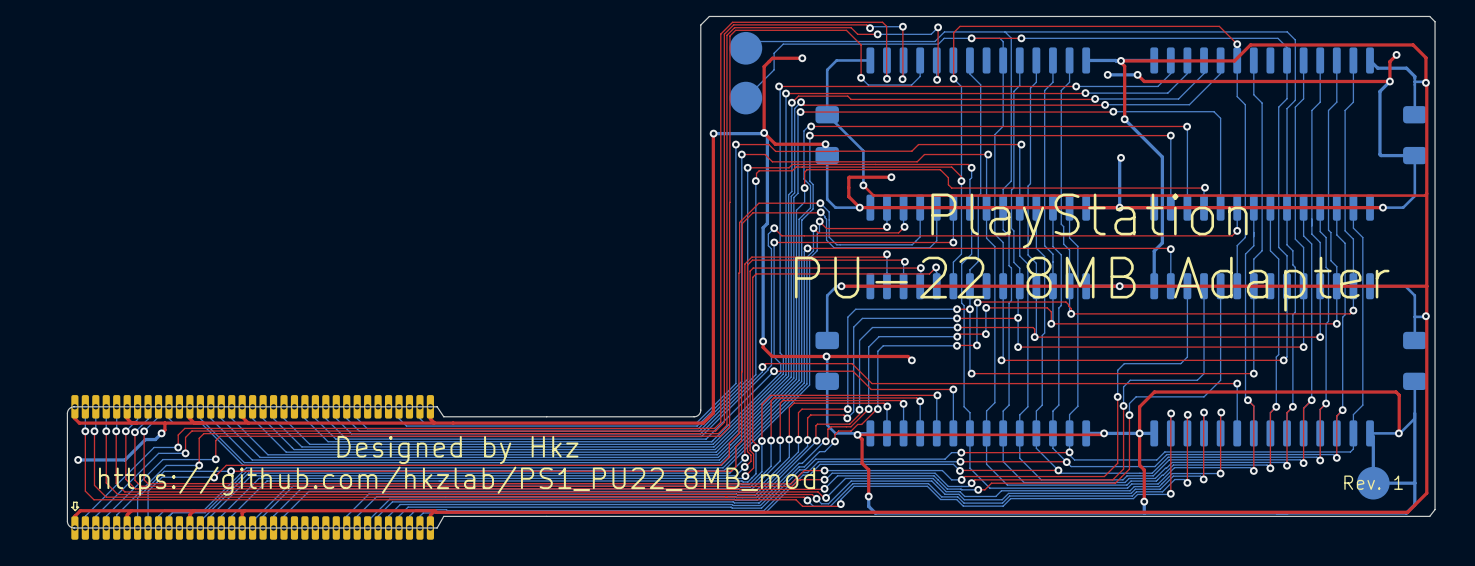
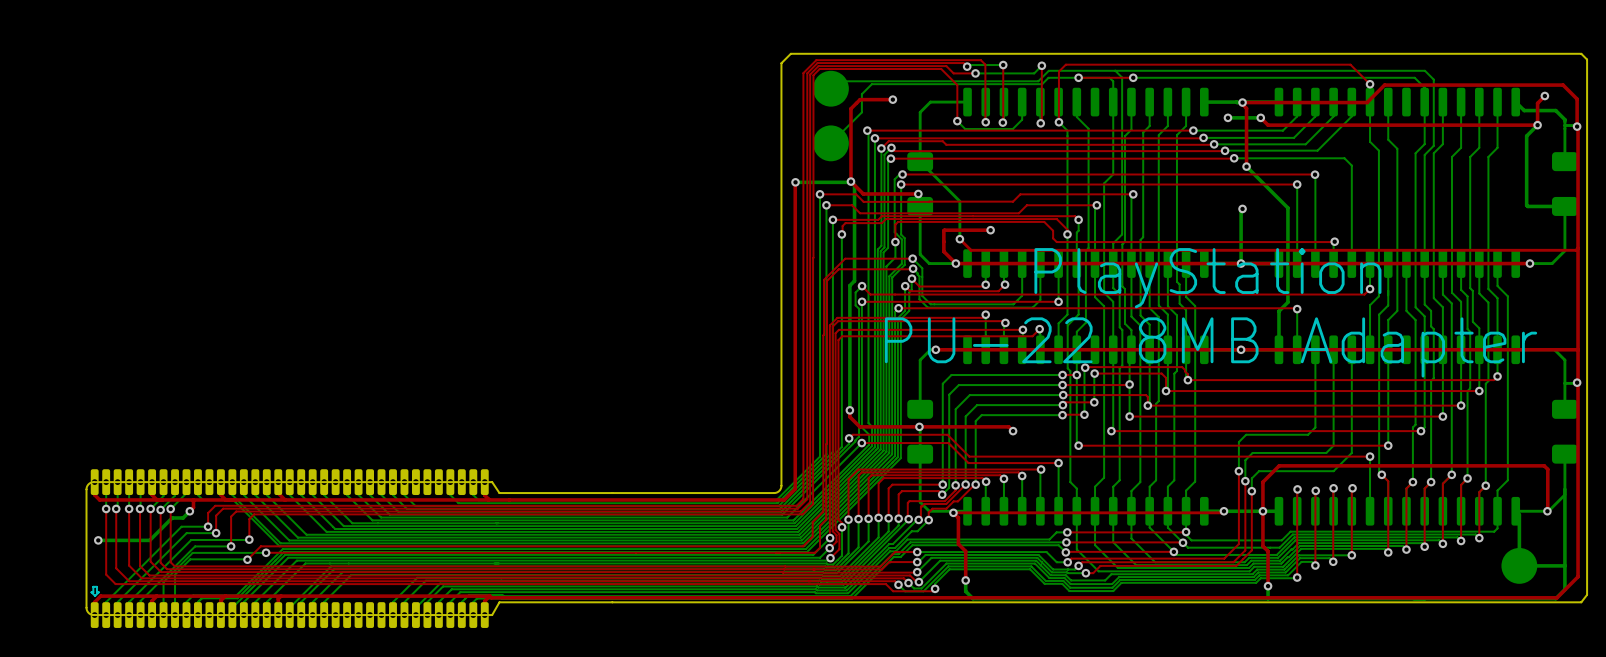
text: Designed by Hkz (457, 450) -> none
text: https://github.com/hkzlab/PS1_PU22_8MB_mod (457, 481) -> none
text: Rev. 1 (1373, 482) -> none

